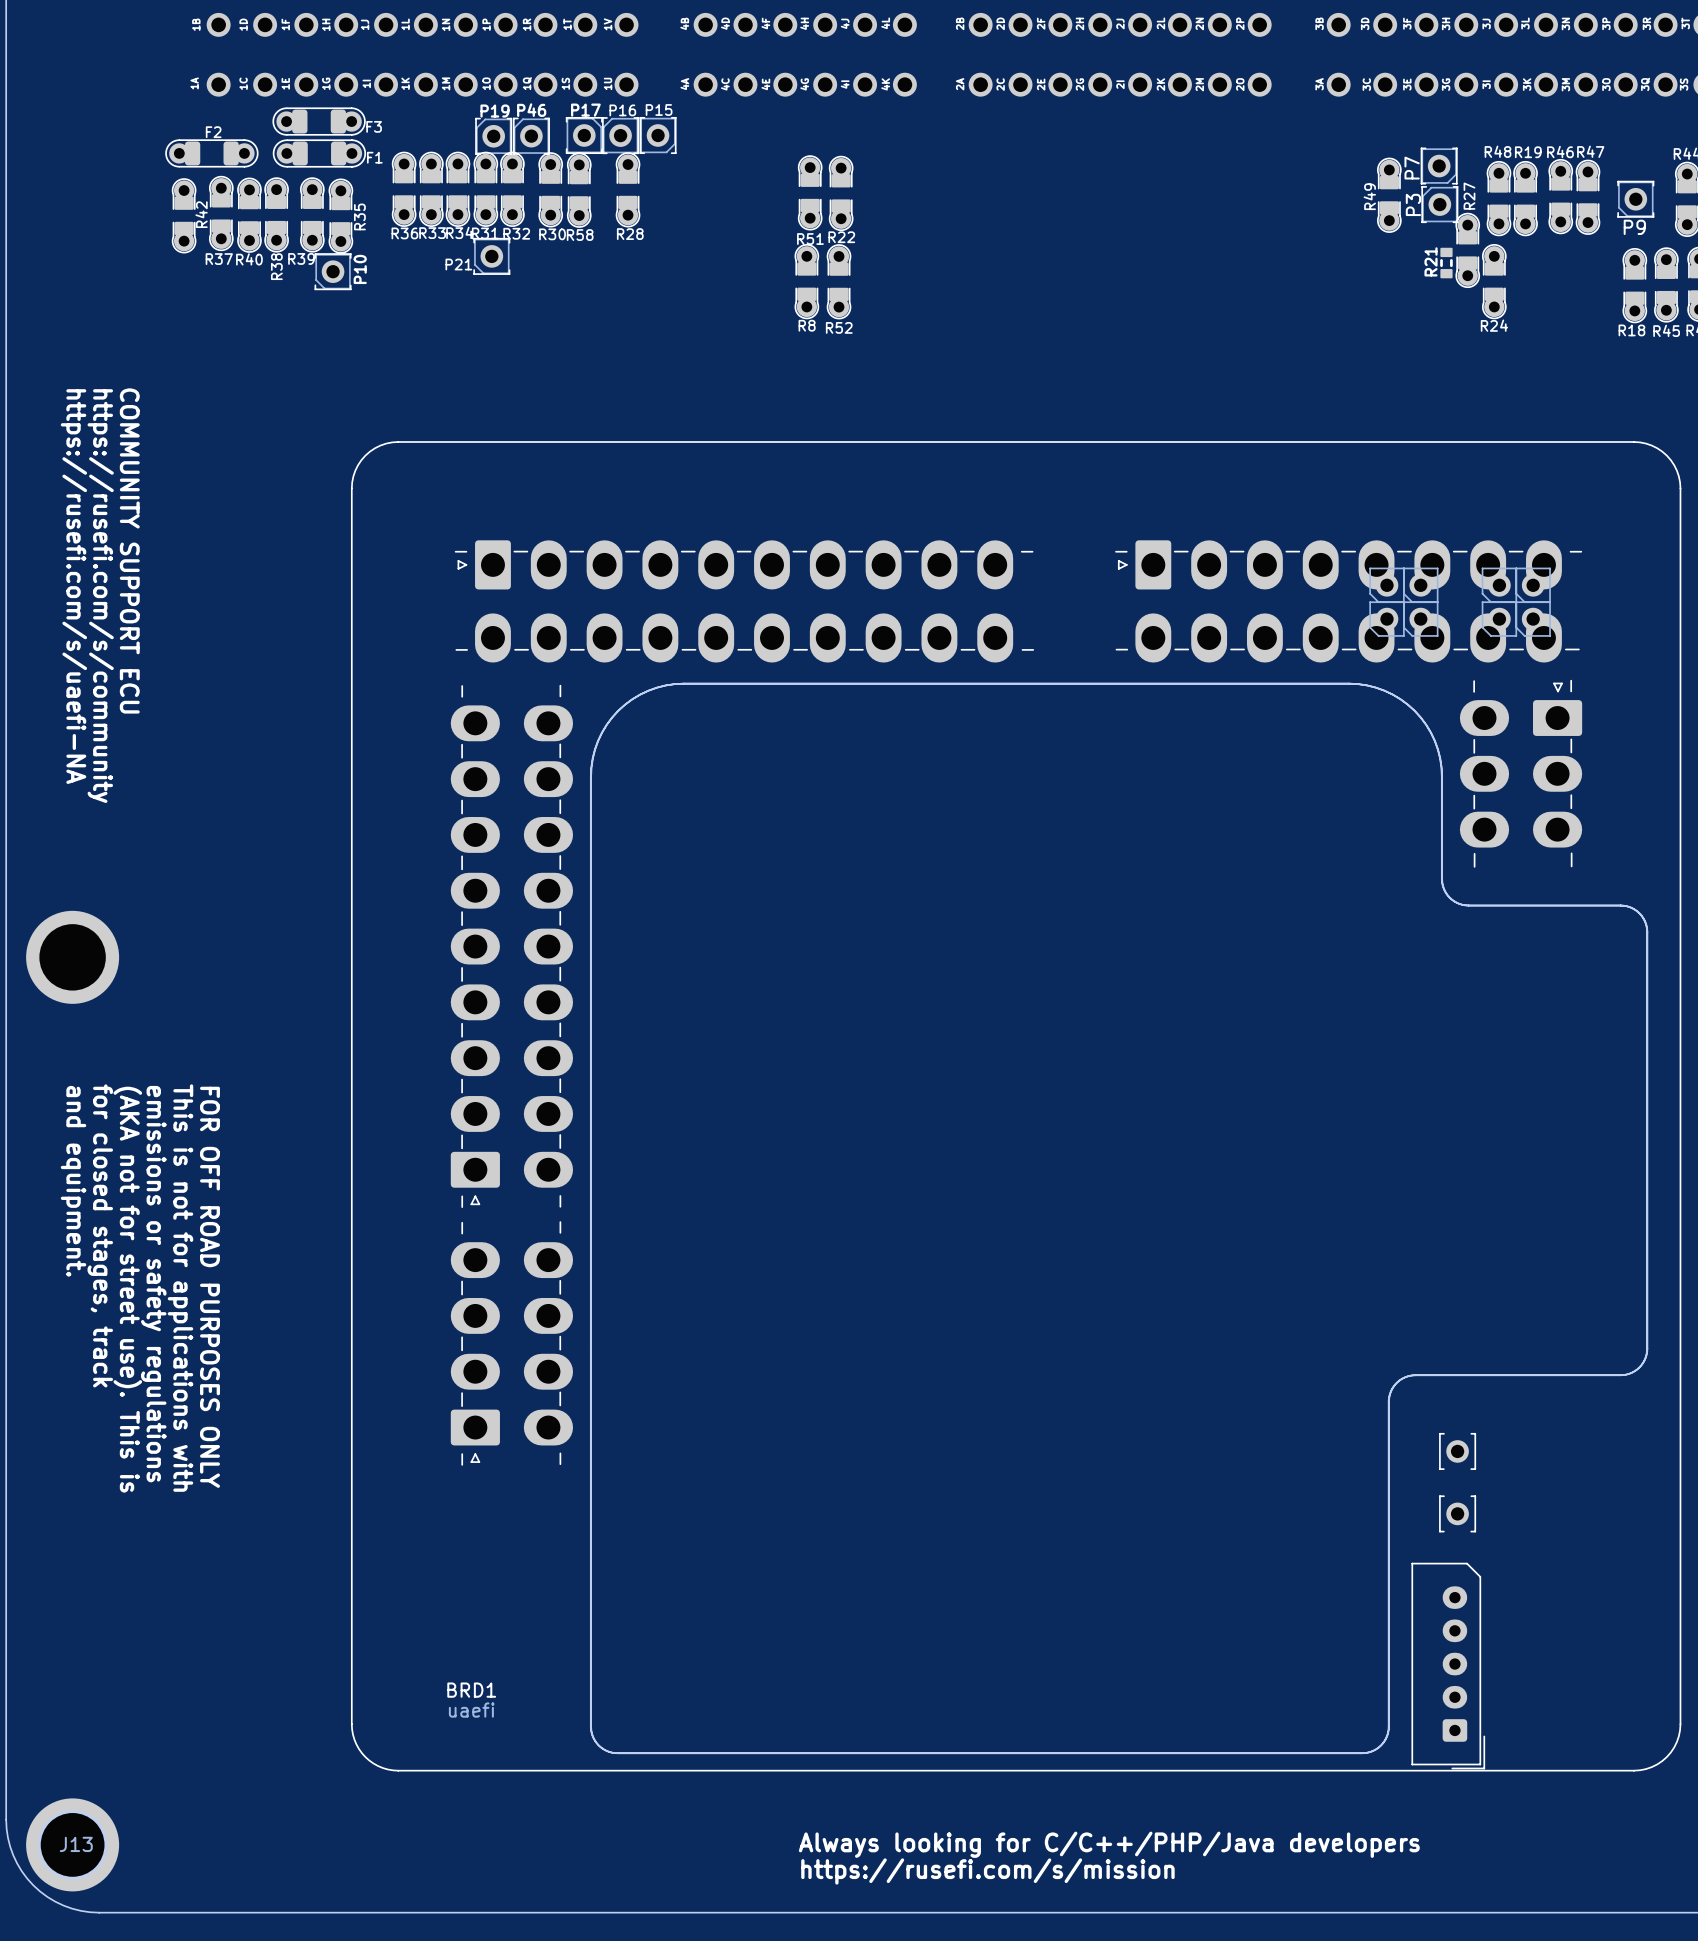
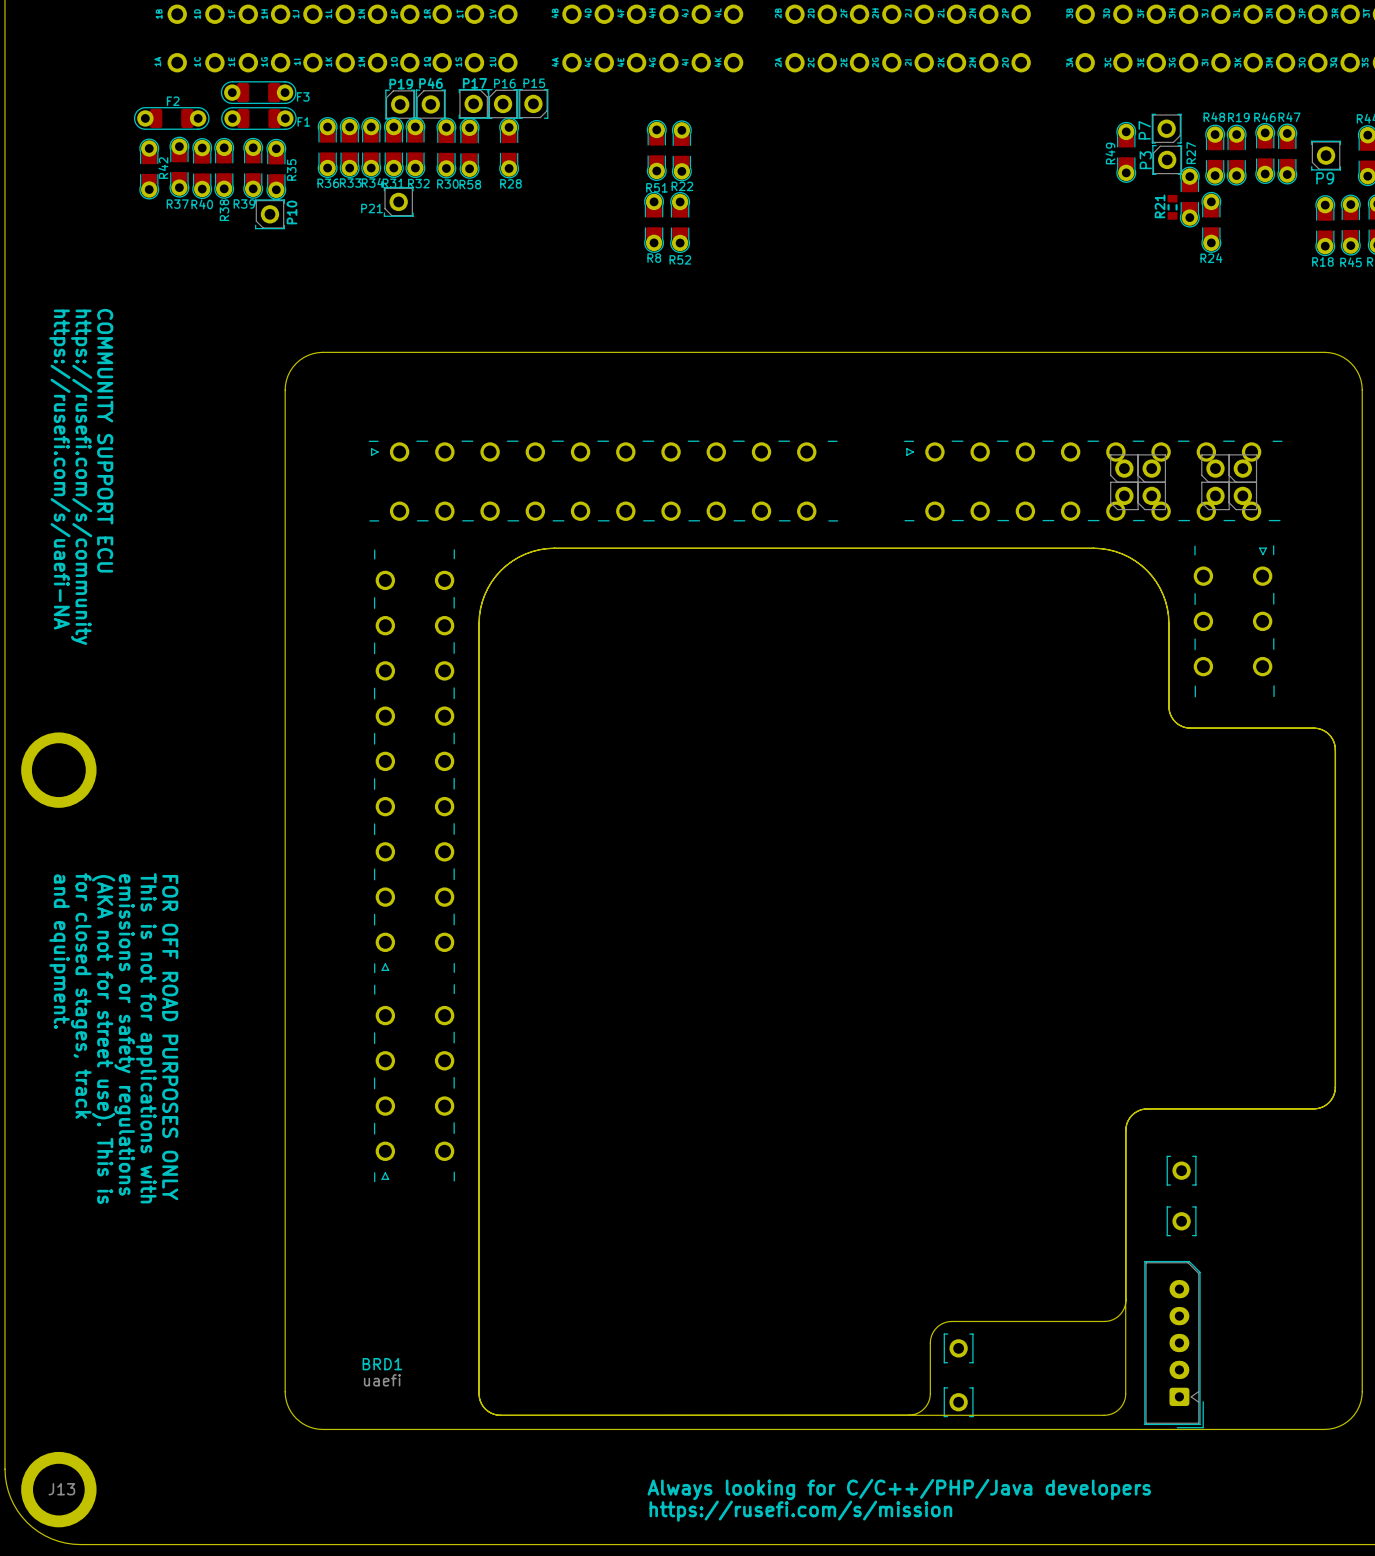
BRD1 footprint: [351, 441, 1682, 1772] -> [284, 351, 1363, 1430]

